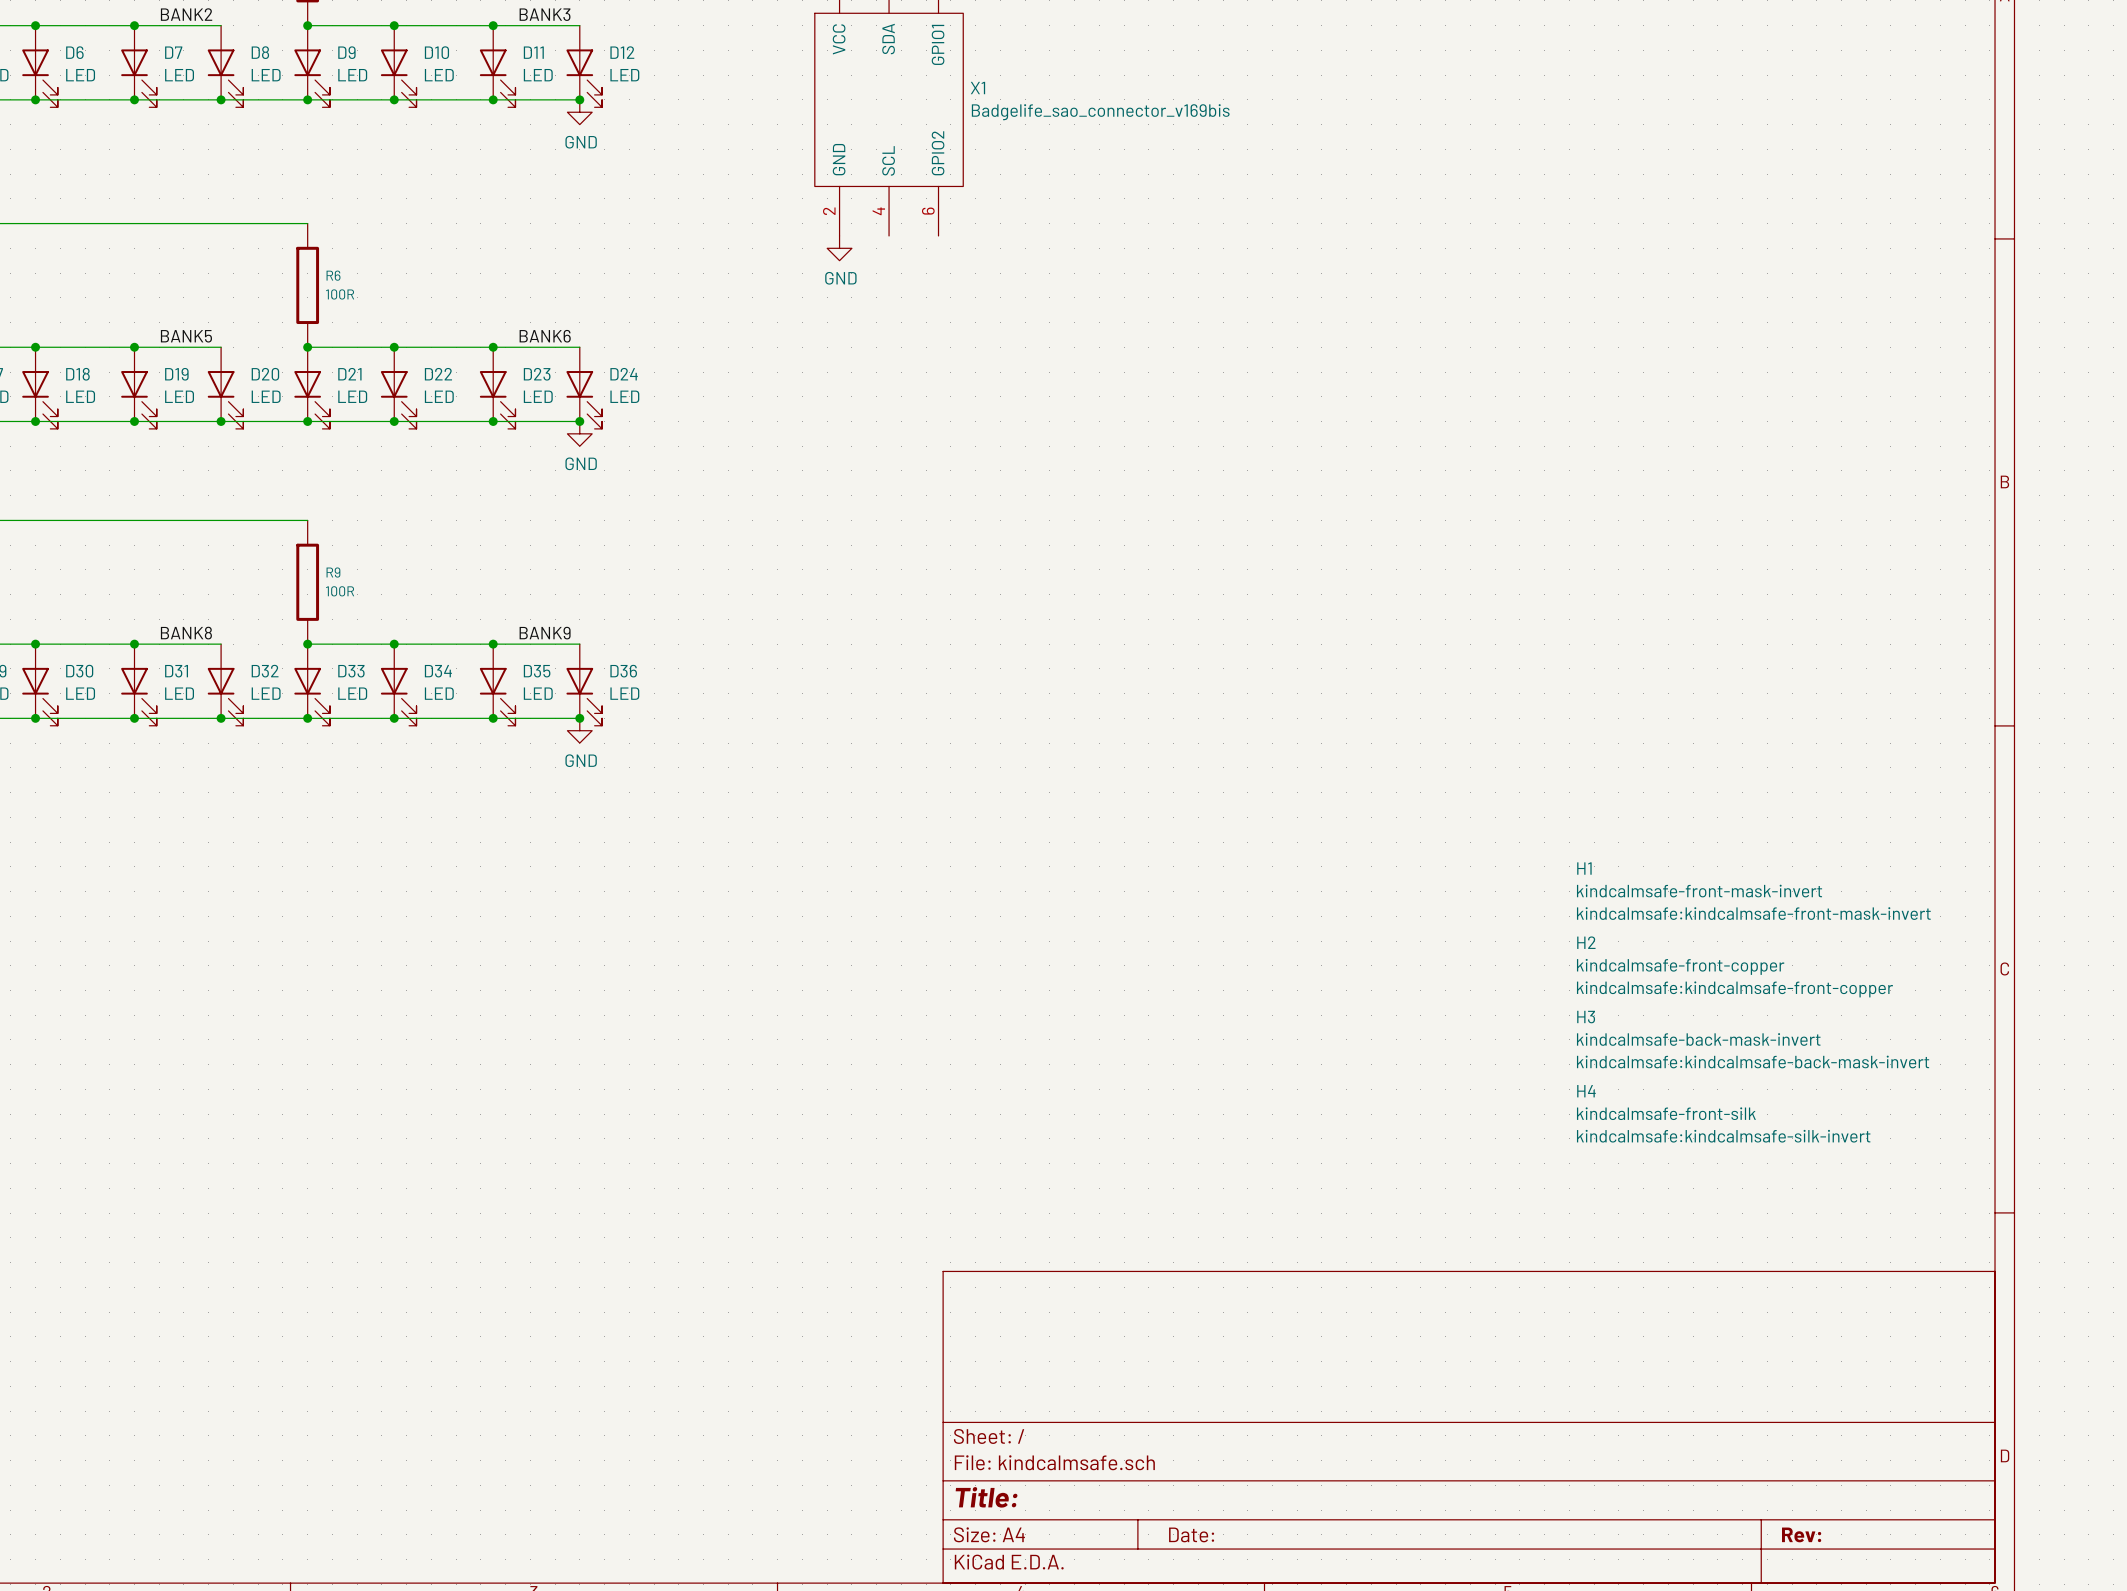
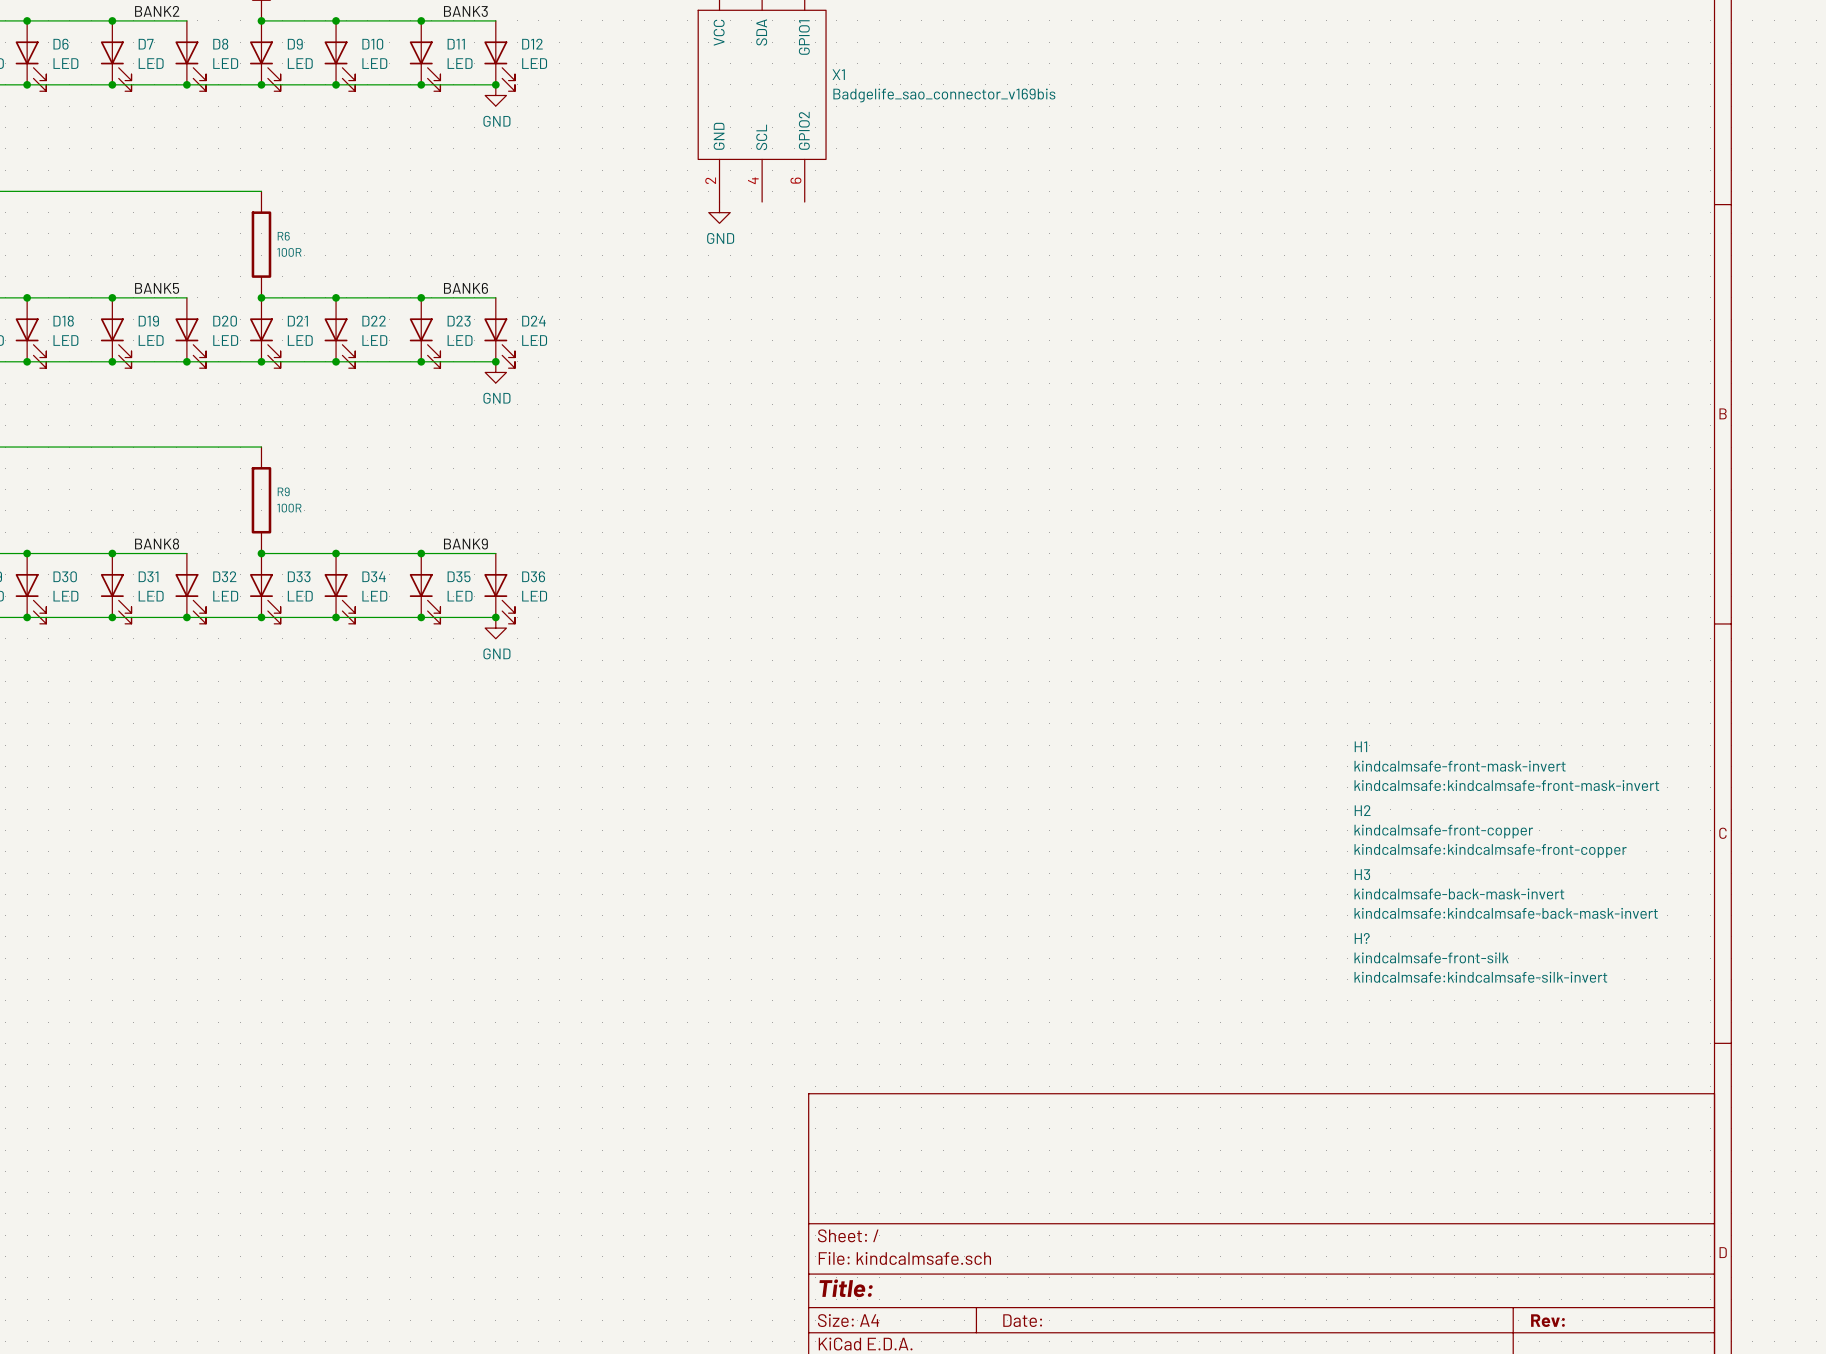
H4 name: H4 (1586, 1091) -> H? (1362, 938)

